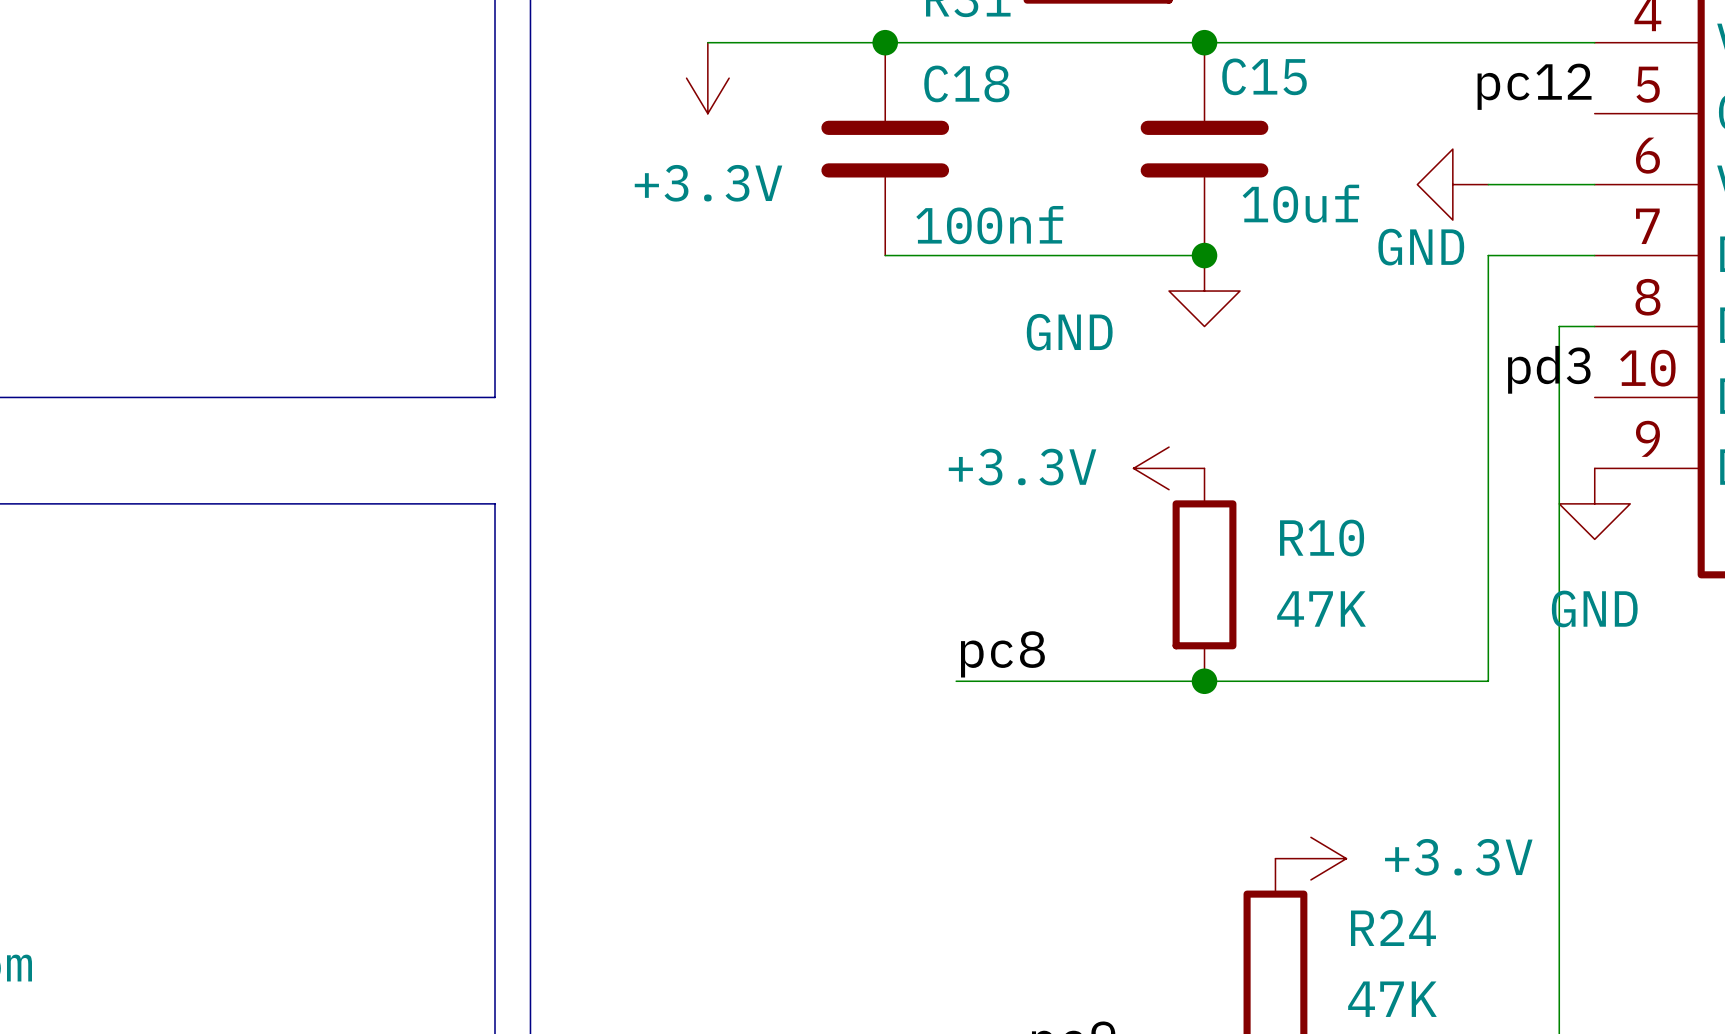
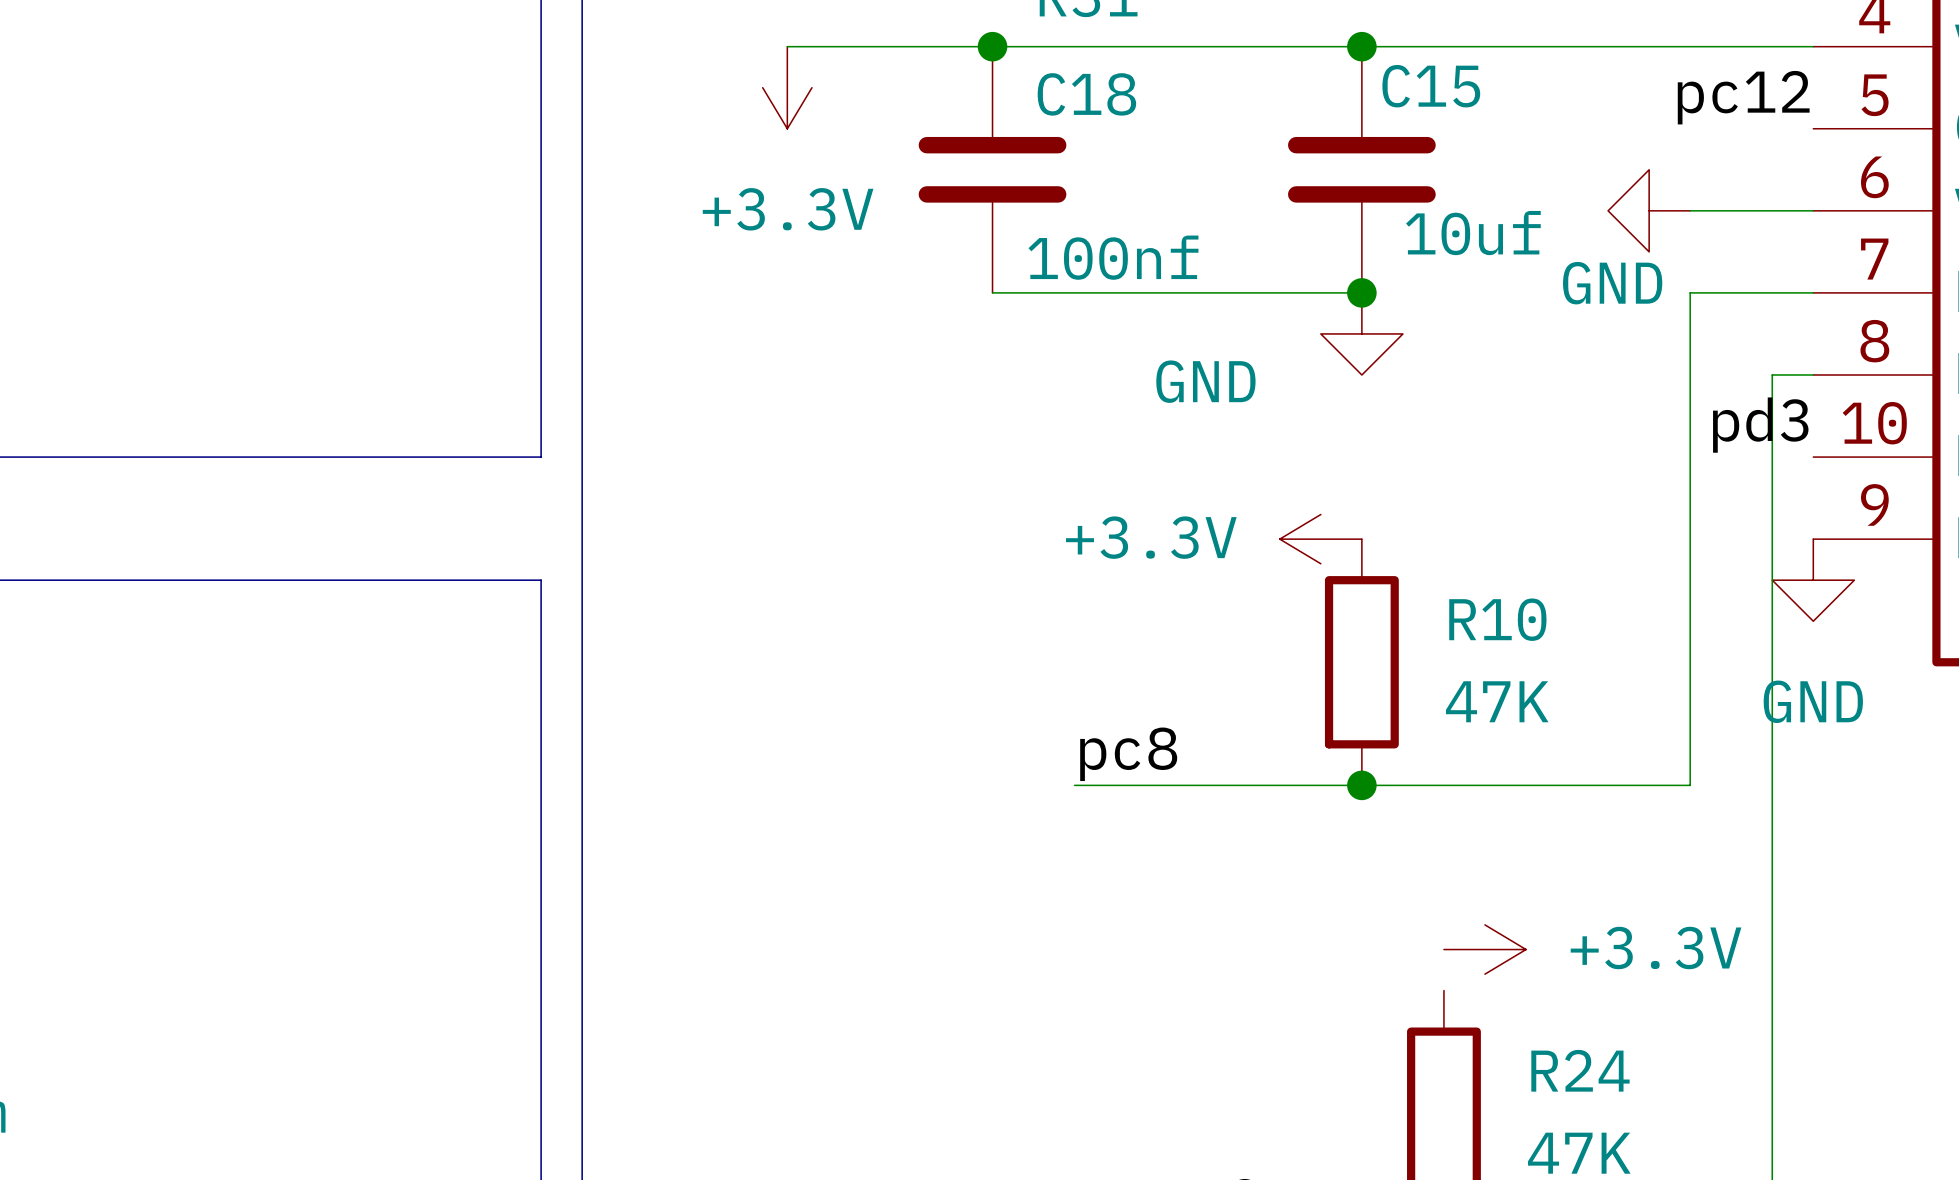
power symbol position: +3.3V (1310, 858) -> +3.3V (1484, 949)

